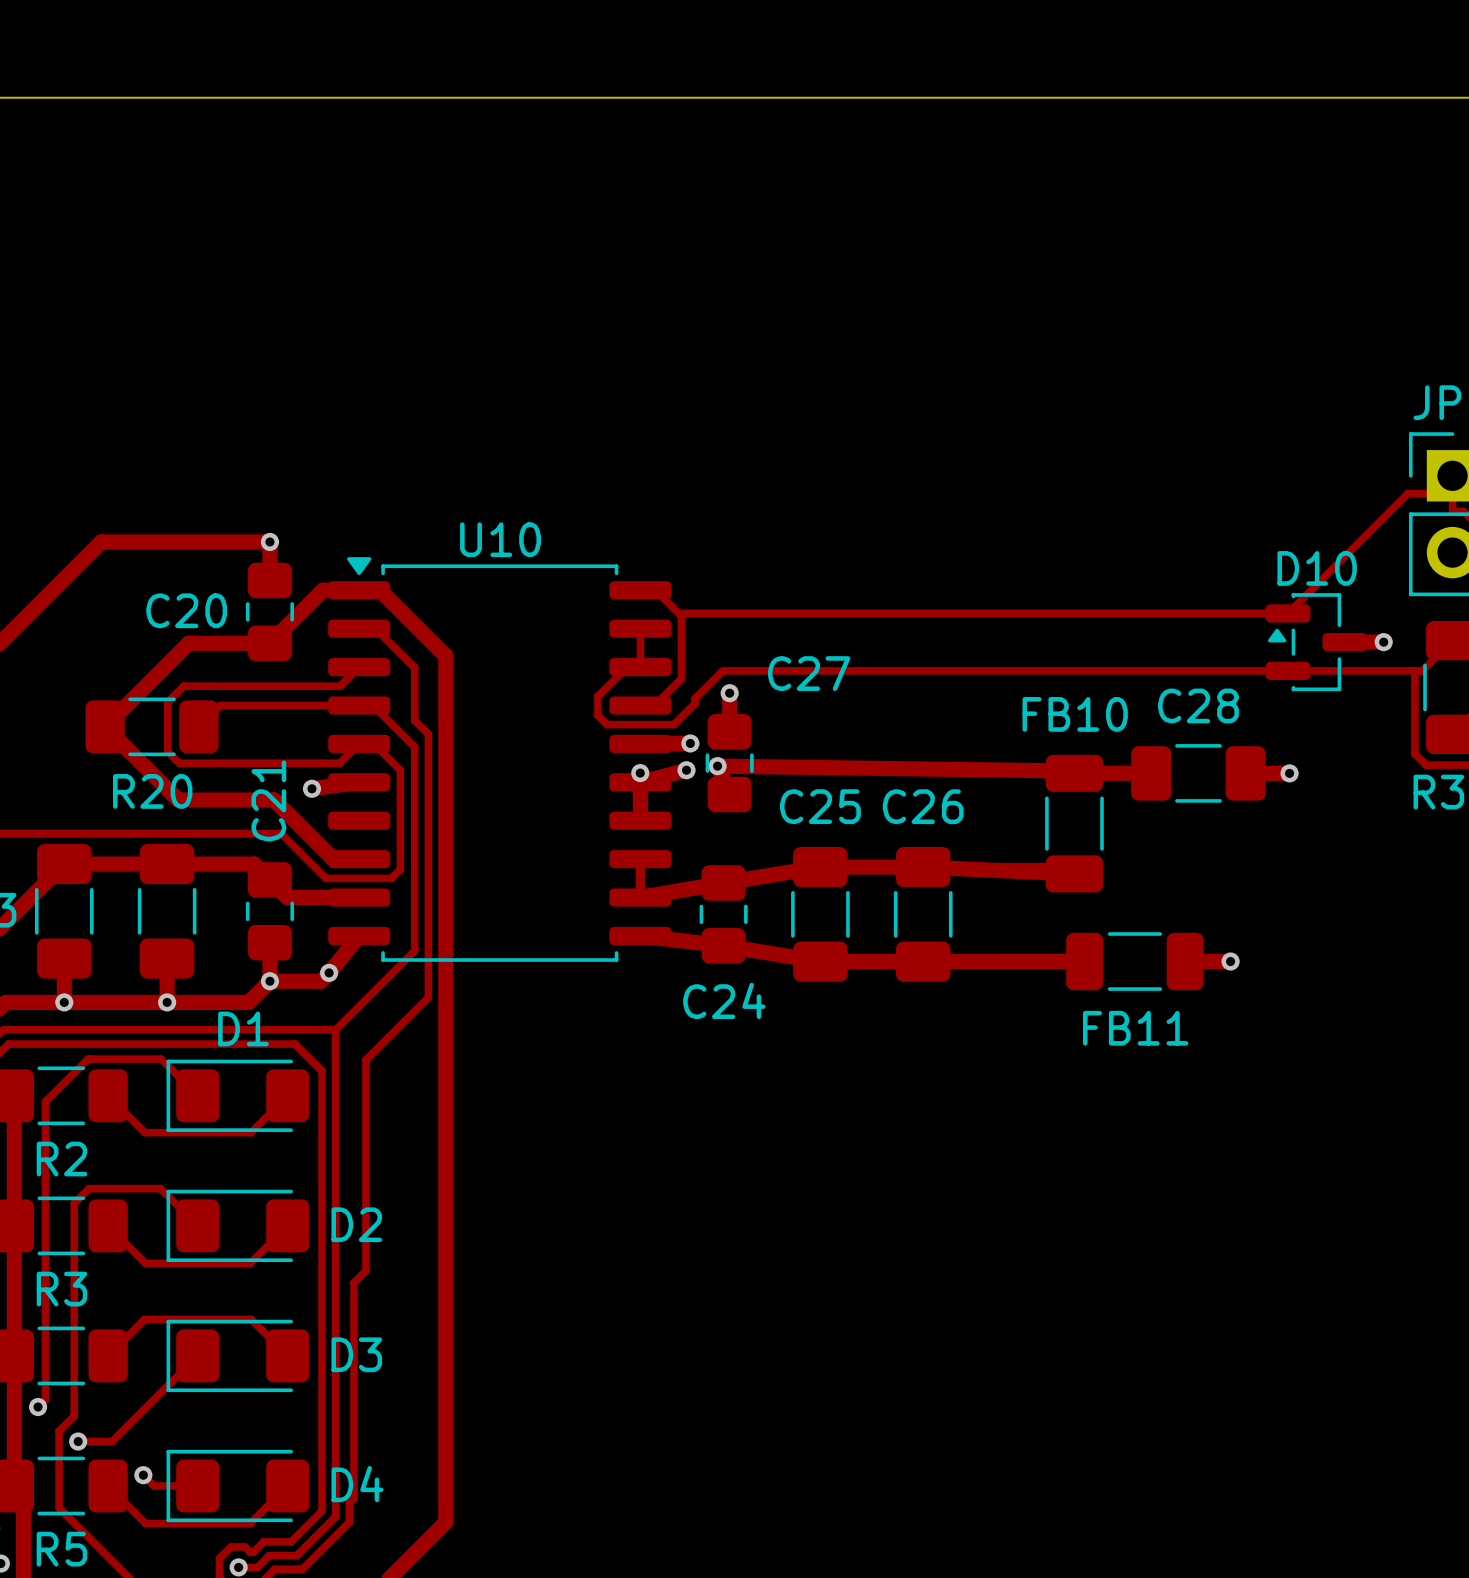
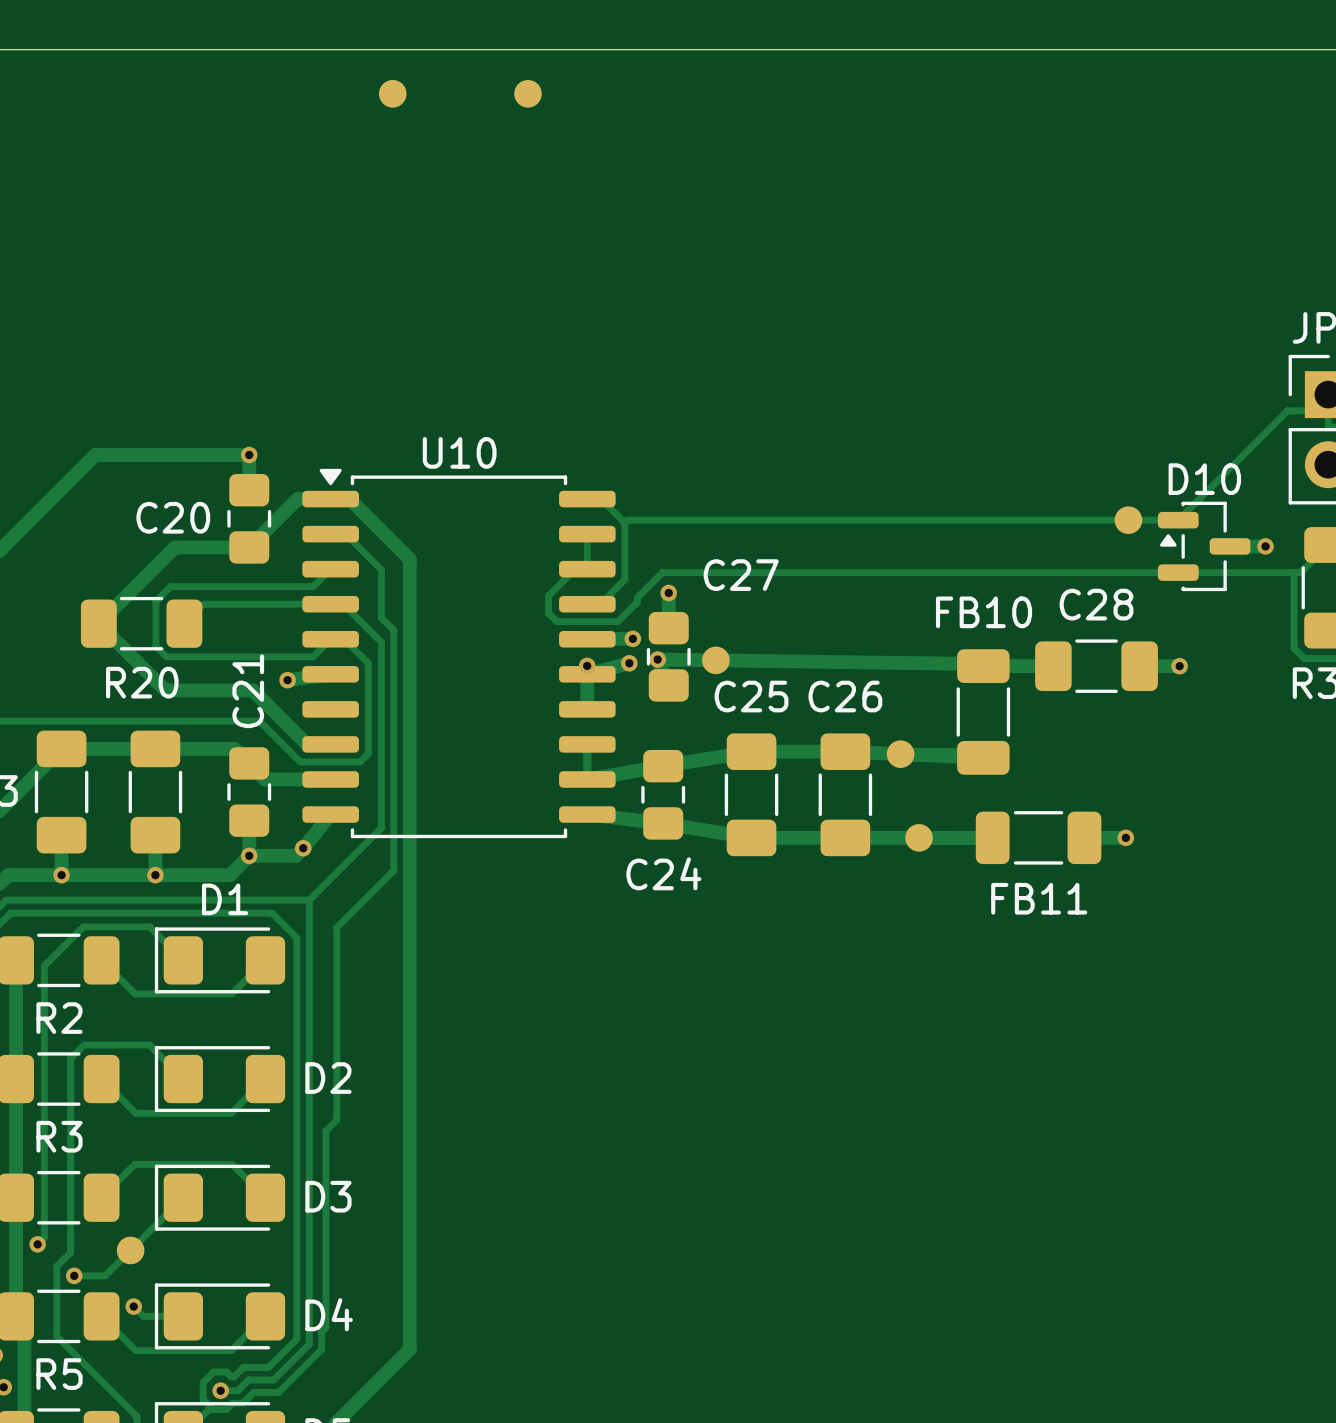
part: none -> (392, 93)
part: none -> (527, 93)
part: none -> (1128, 520)
part: none -> (715, 660)
part: none -> (900, 754)
part: none -> (919, 837)
part: none -> (130, 1250)

